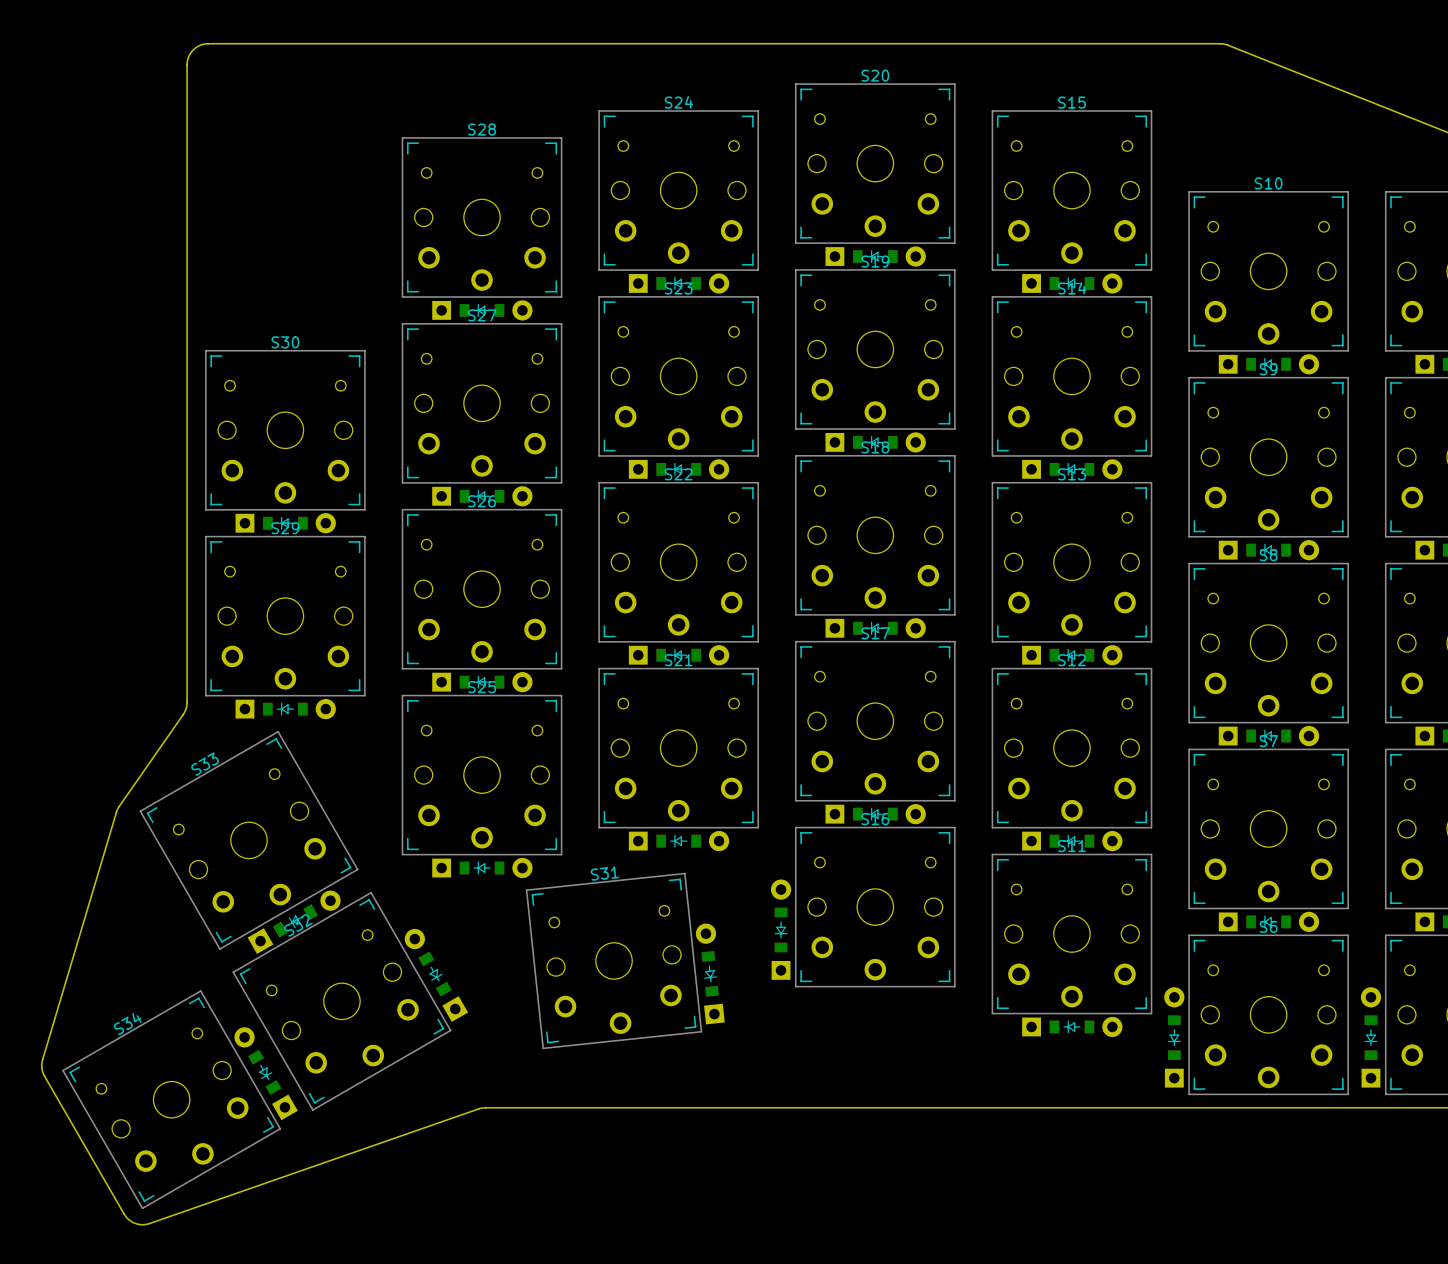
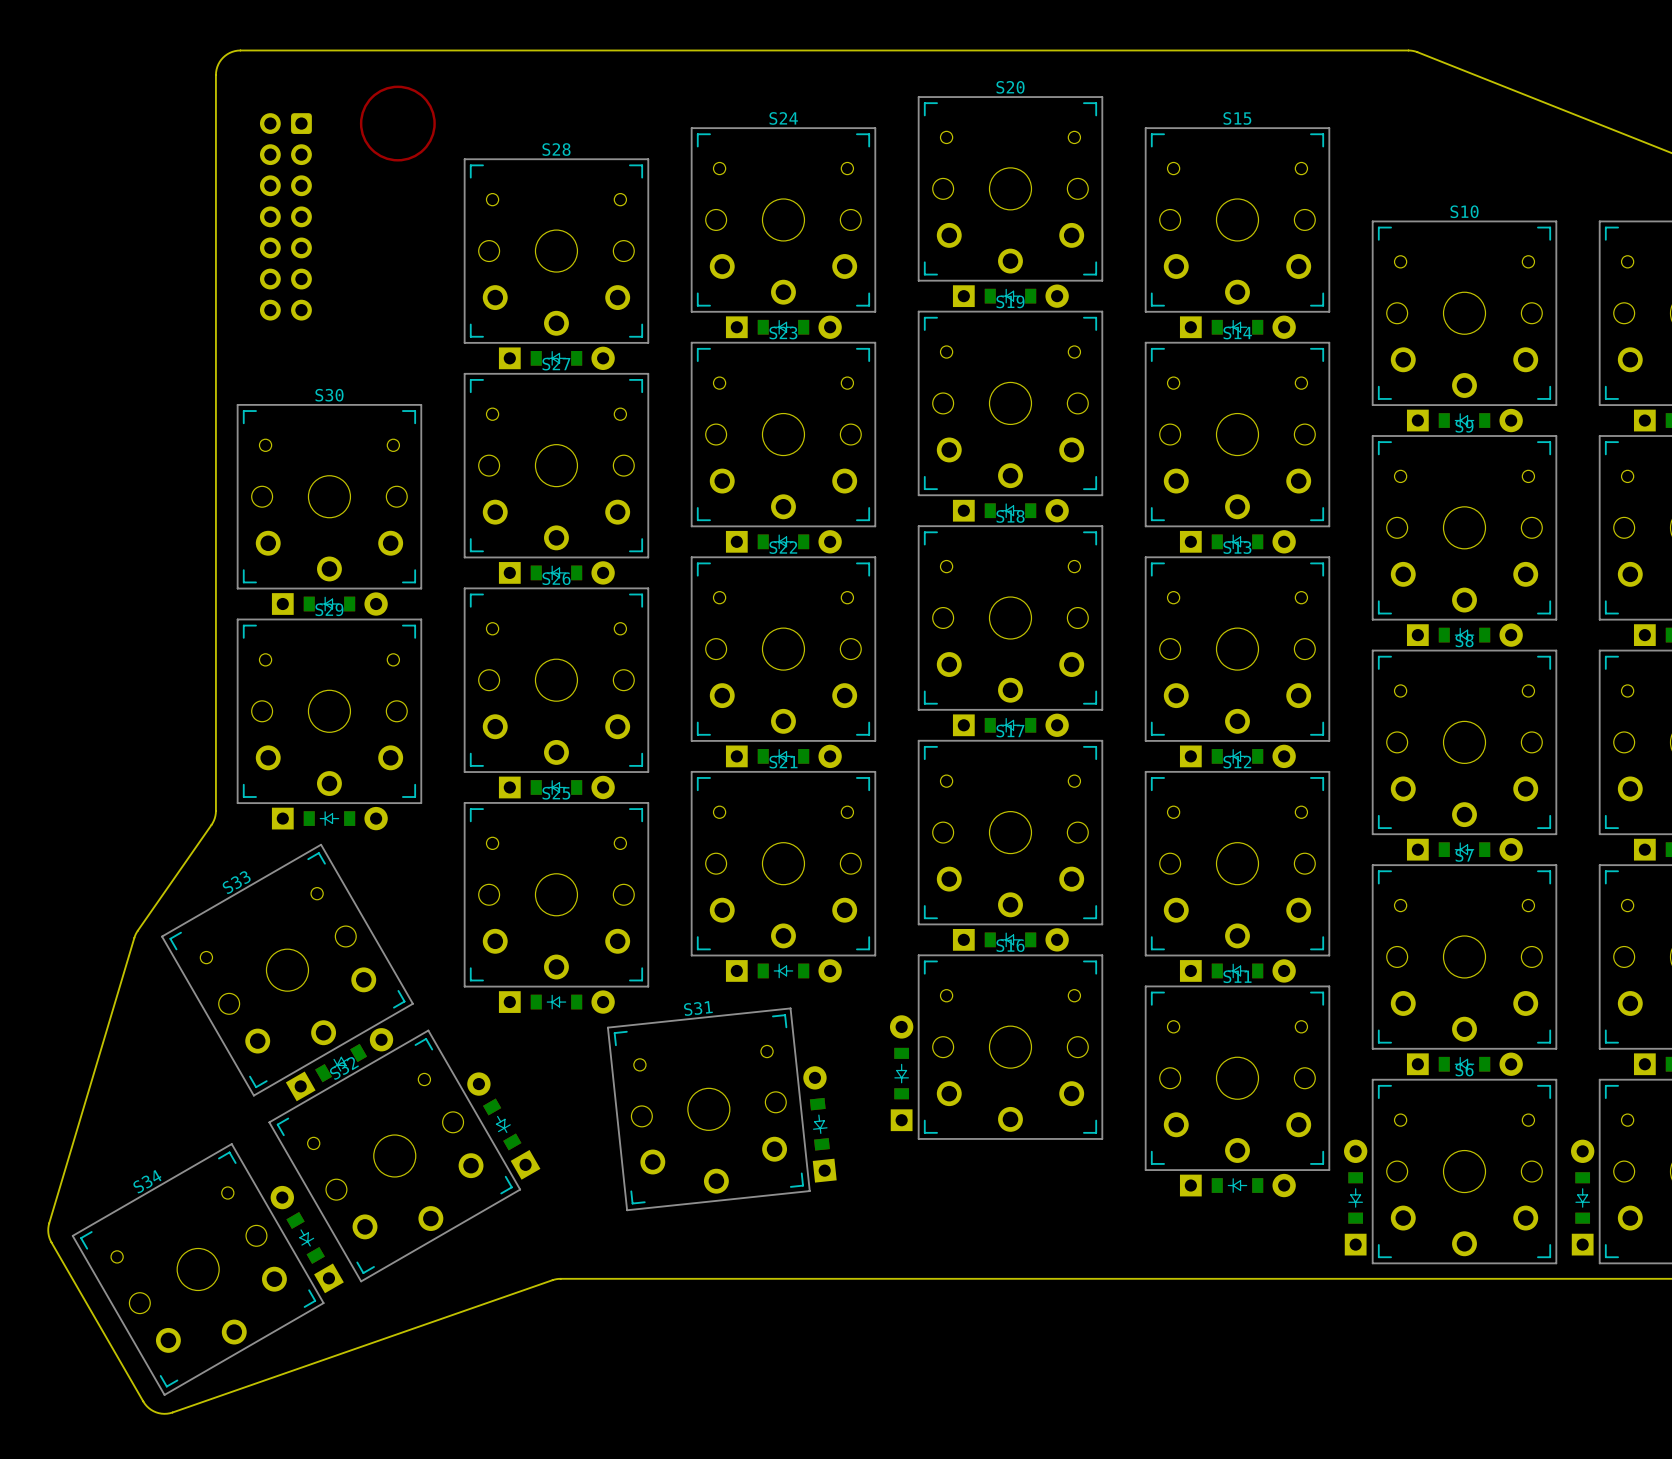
drawing: none -> [359, 85, 436, 162]
part: none -> (285, 216)

